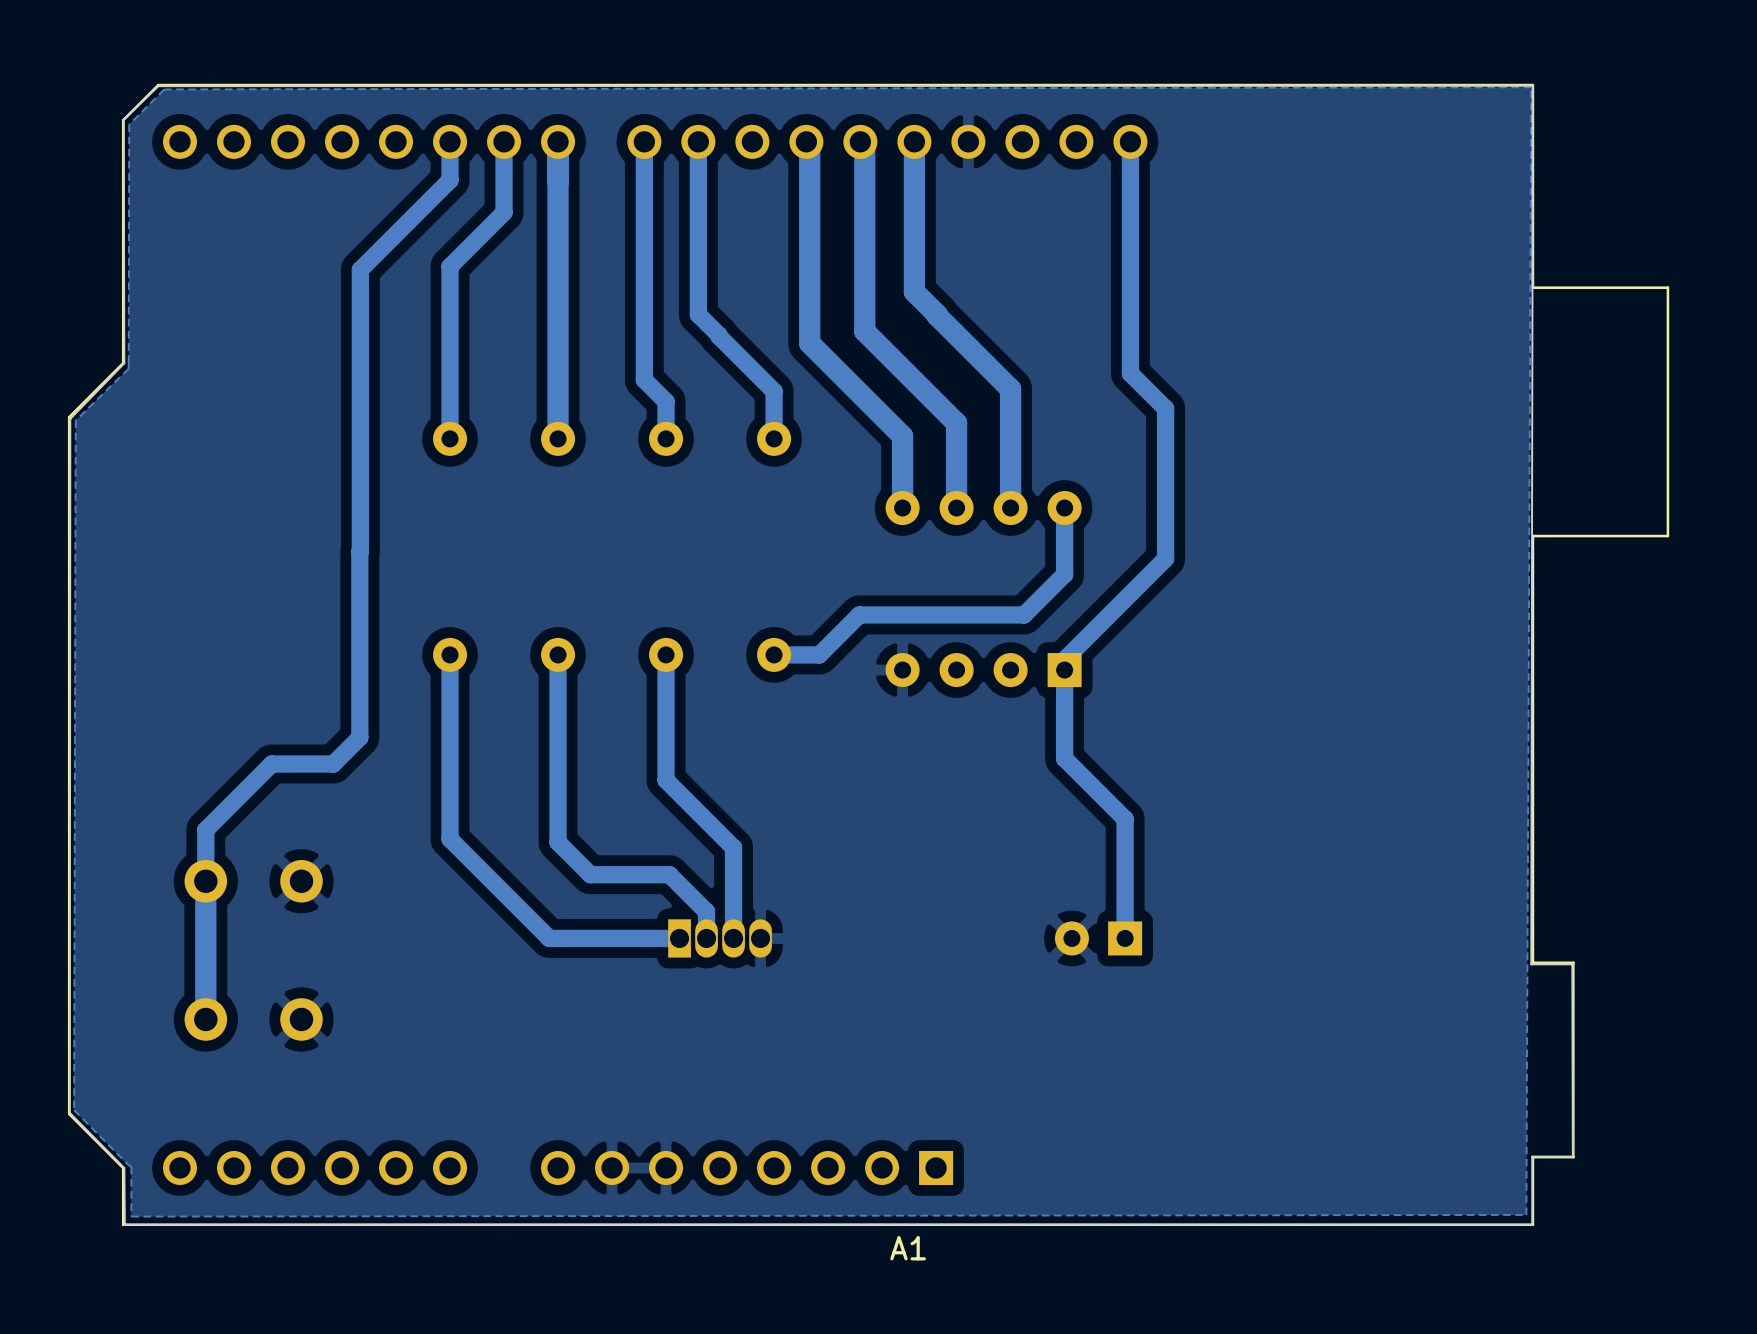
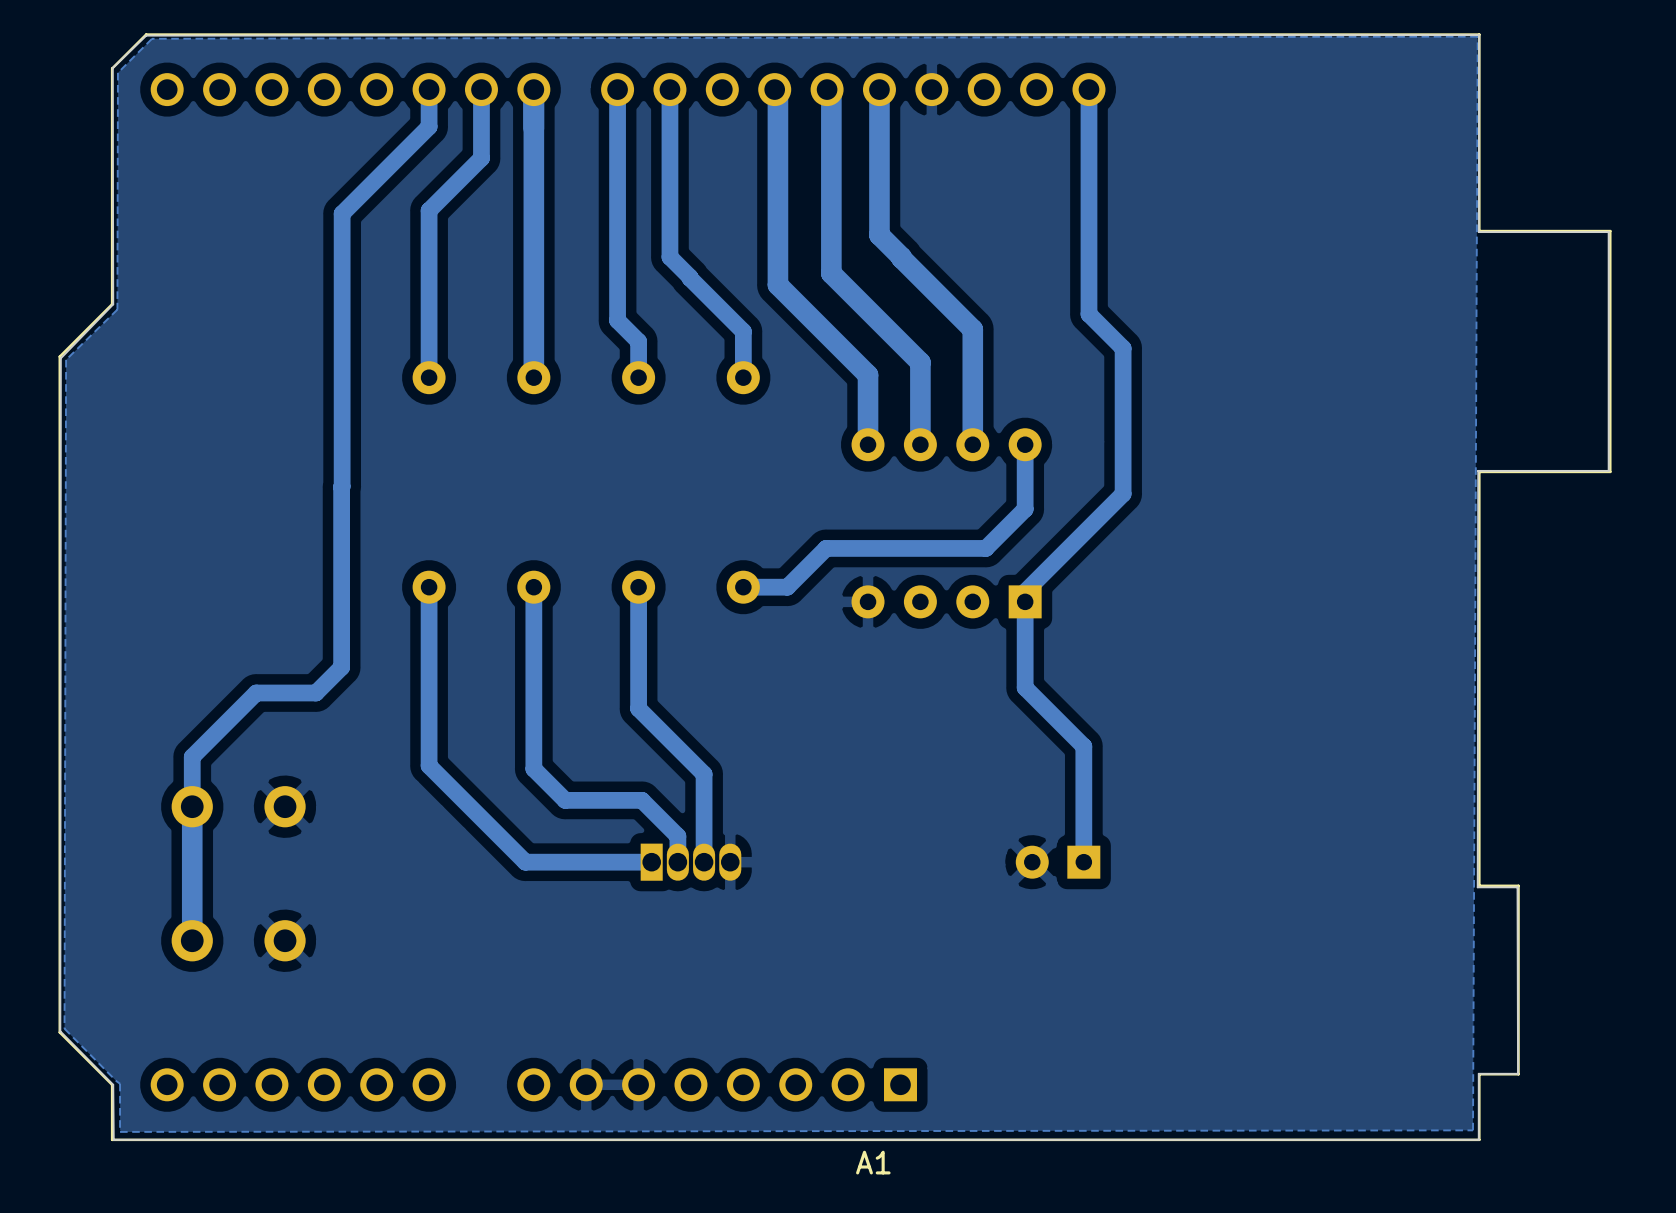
board edge: (1532, 85) (1531, 964) -> (1479, 35) (1478, 232) (1608, 232) (1608, 470) (1478, 470) (1477, 887)

